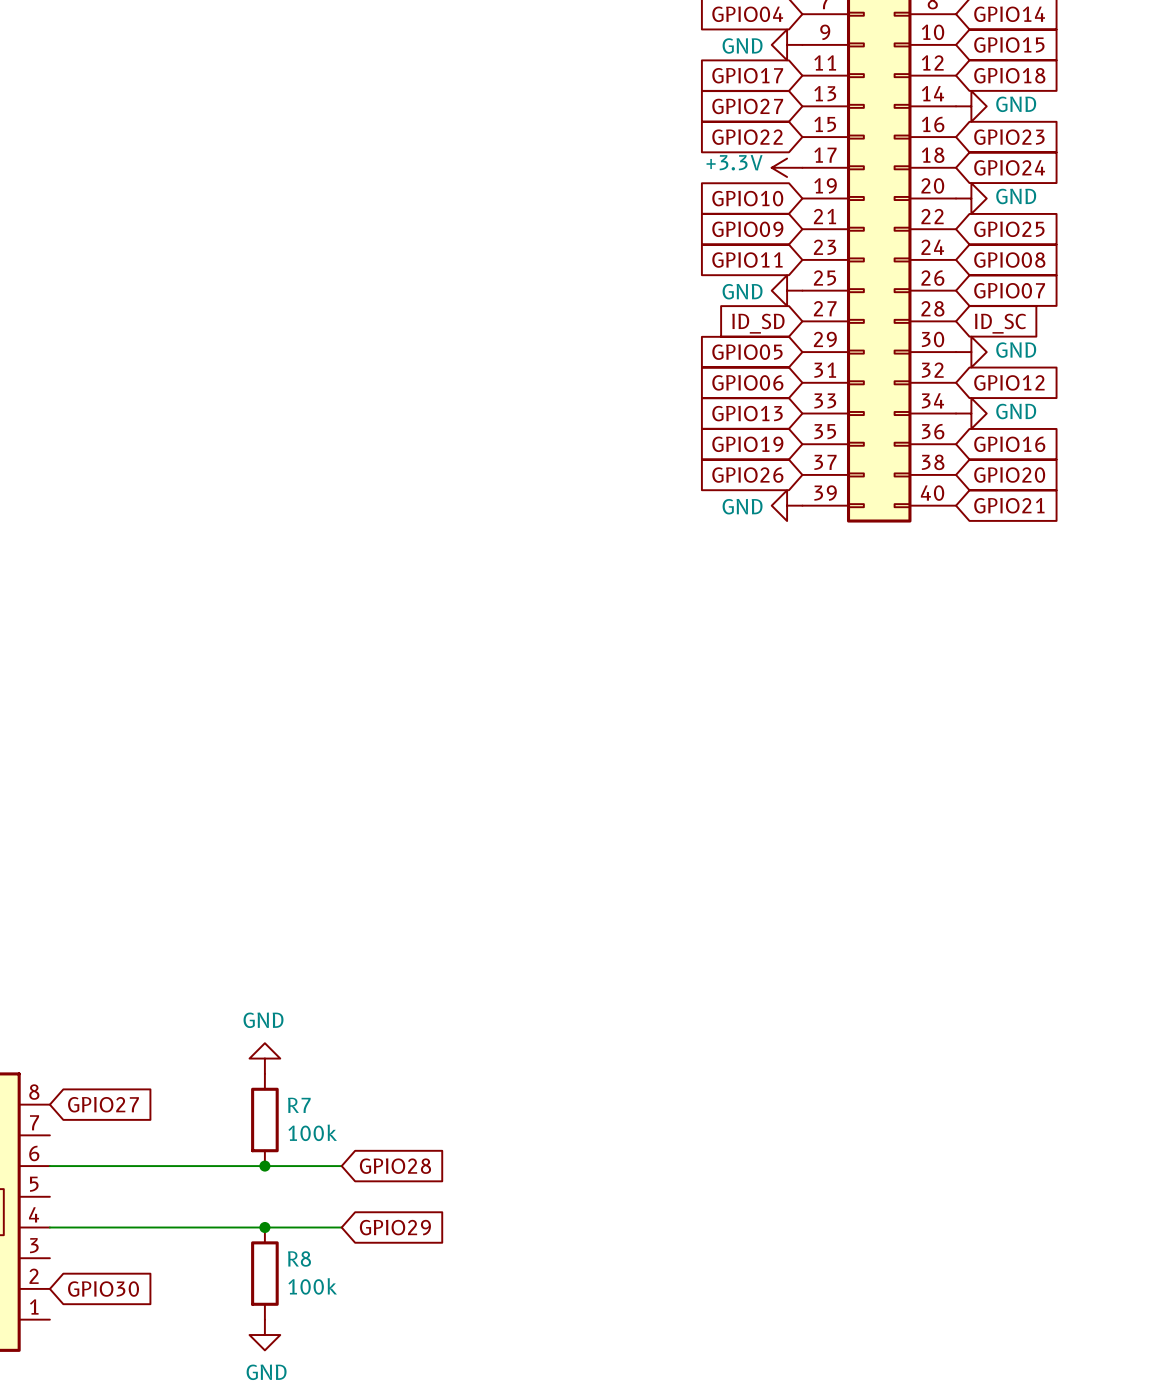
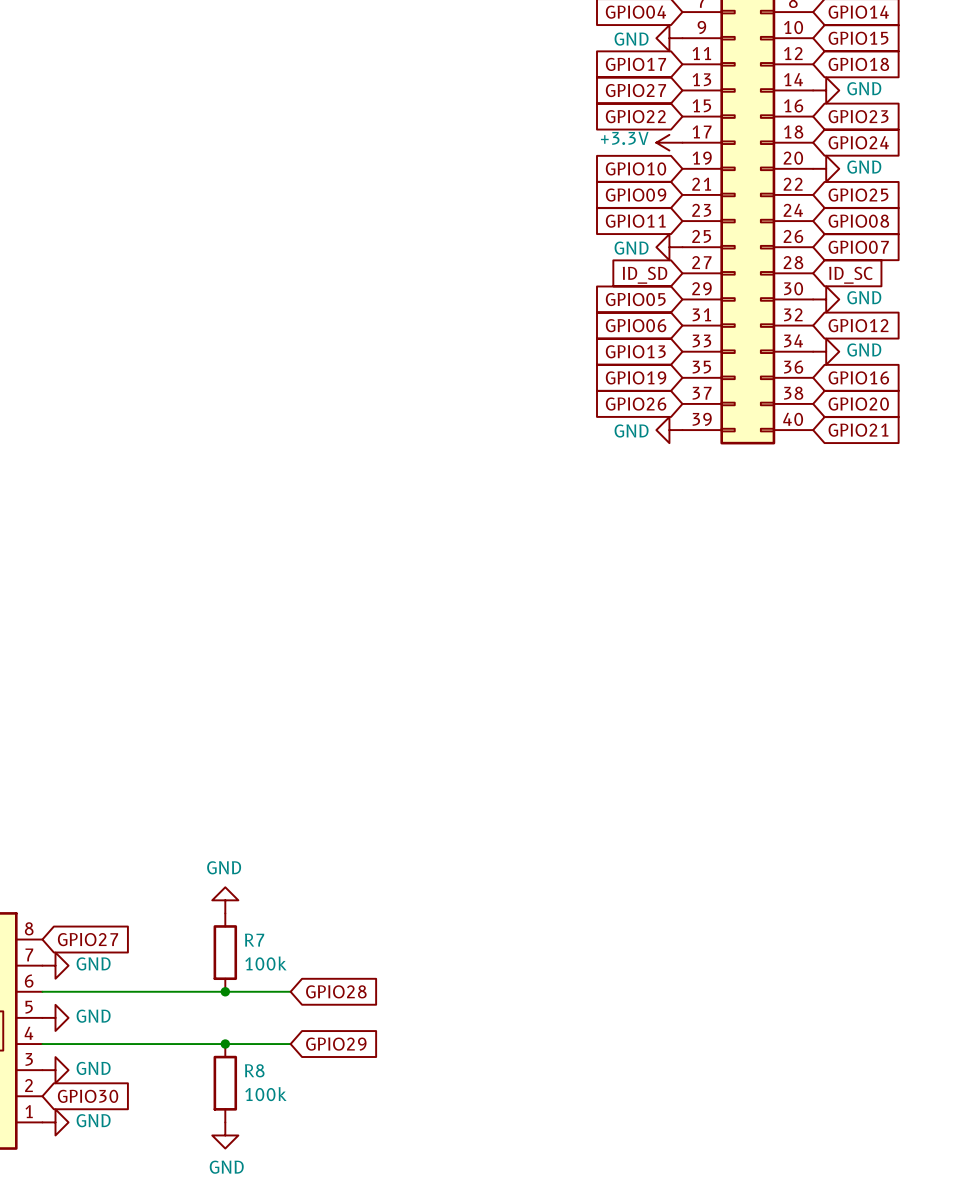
power symbol: none -> GND (55, 965)
power symbol: none -> GND (55, 1017)
power symbol: none -> GND (55, 1070)
power symbol: none -> GND (55, 1122)

